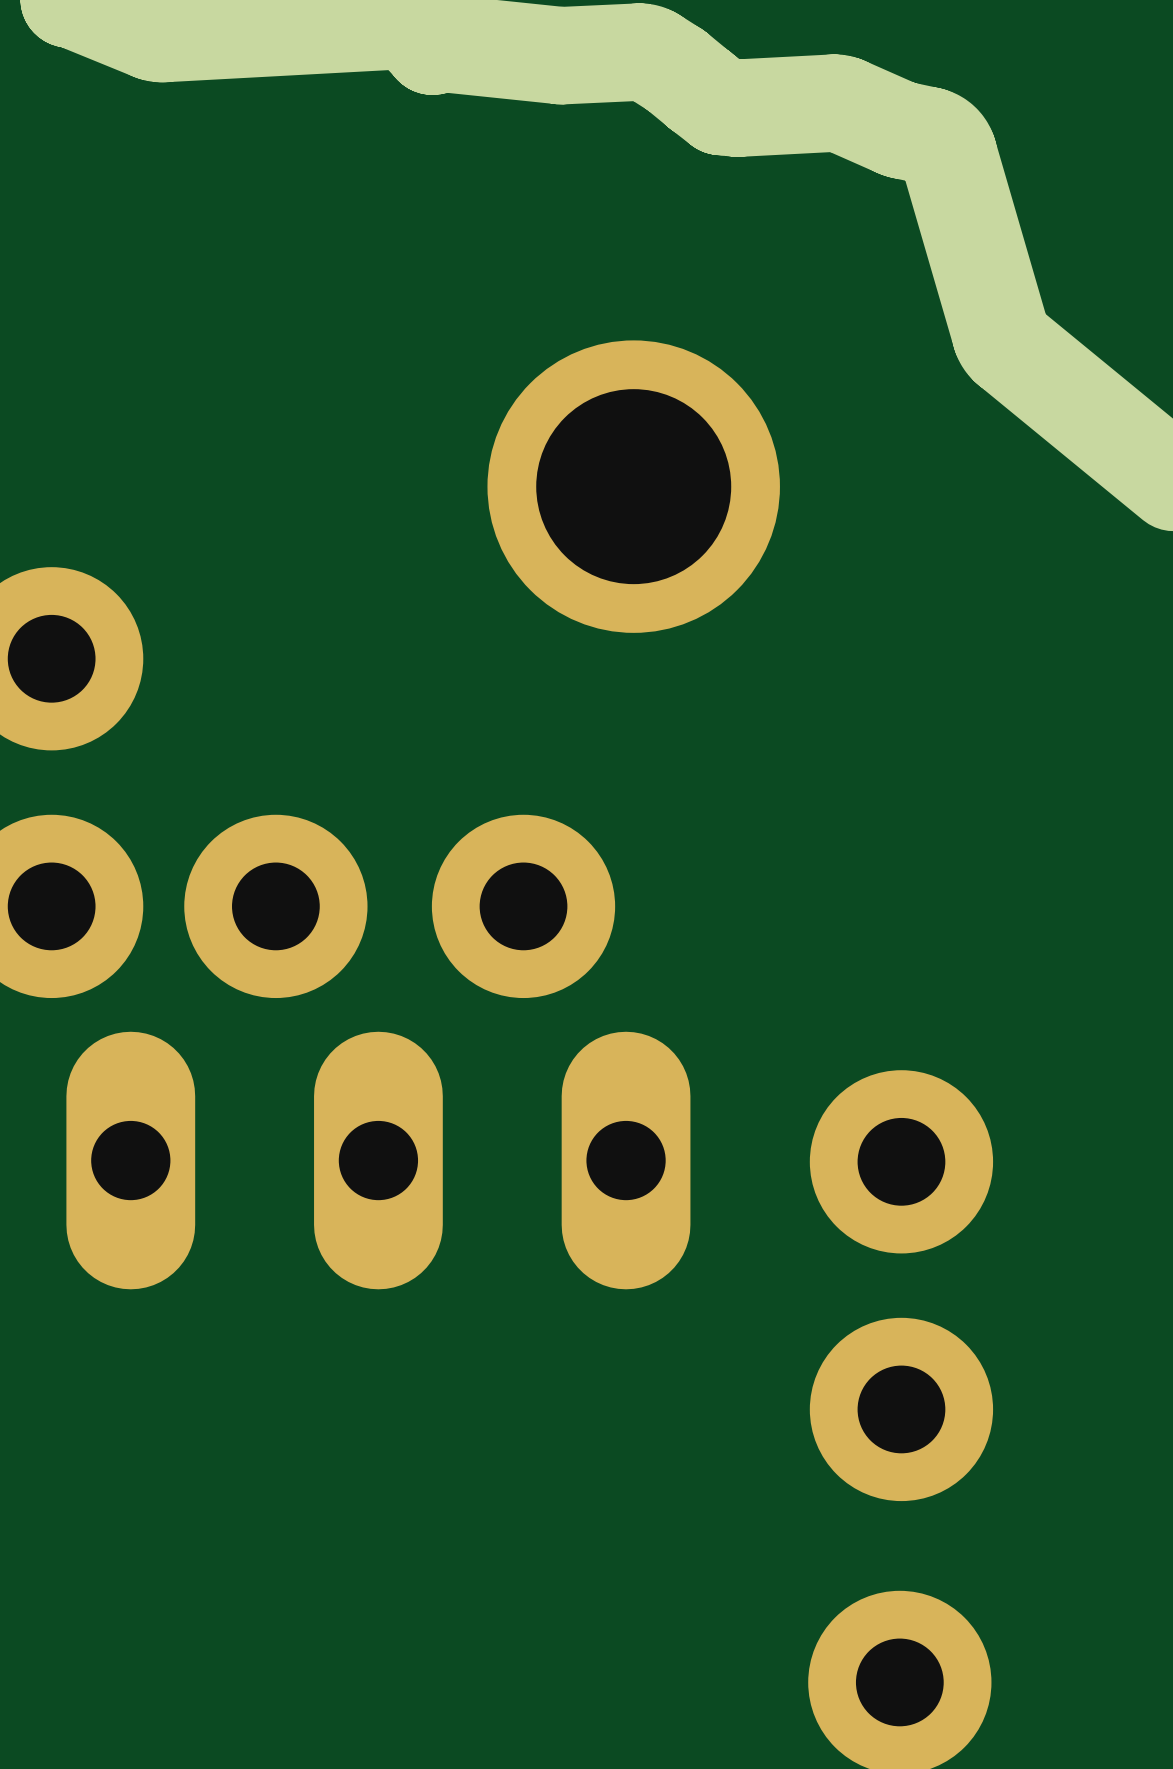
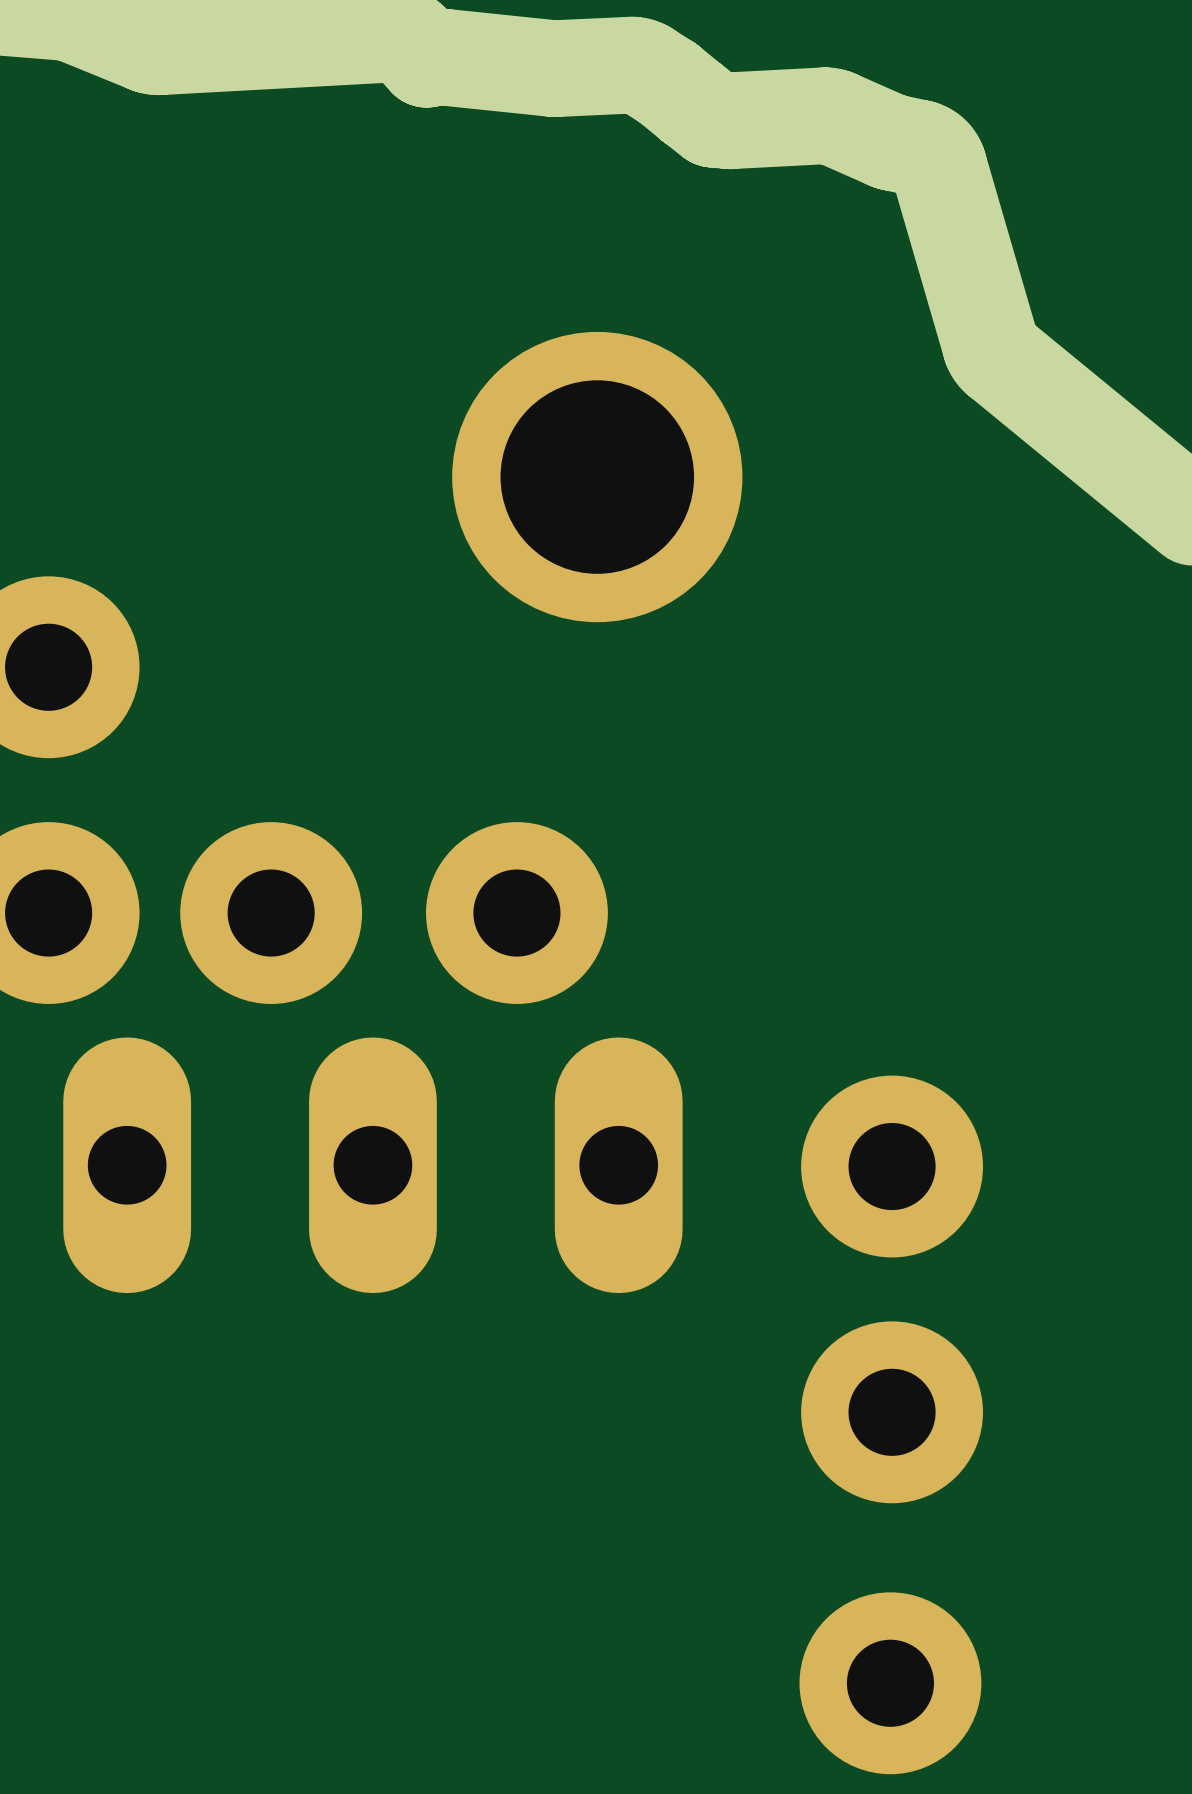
part position: (633, 486) -> (597, 477)

